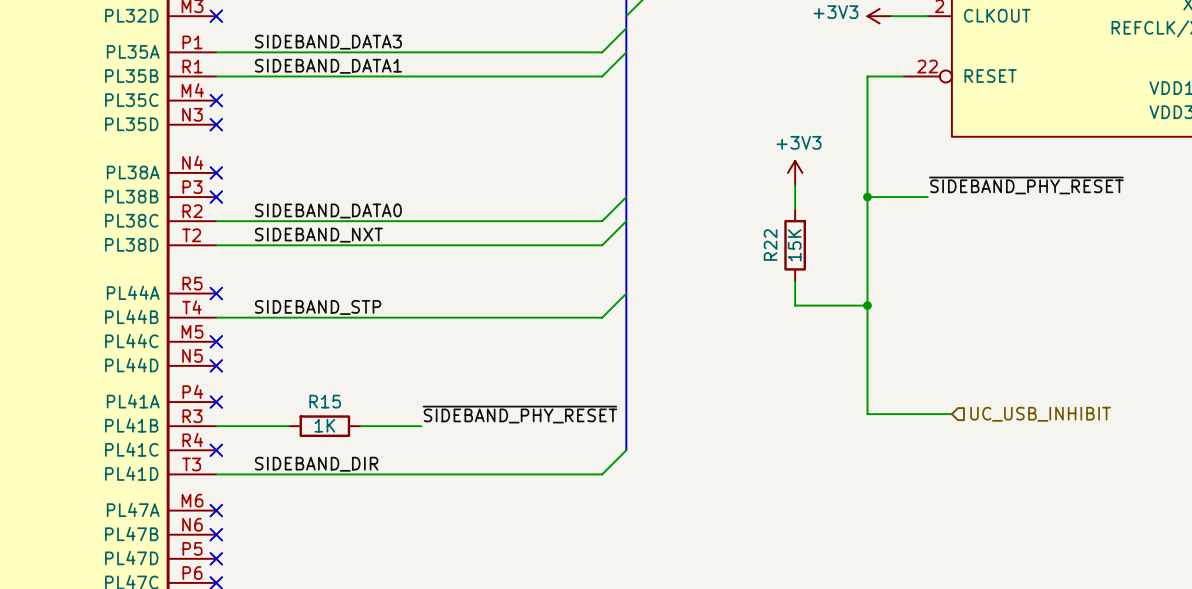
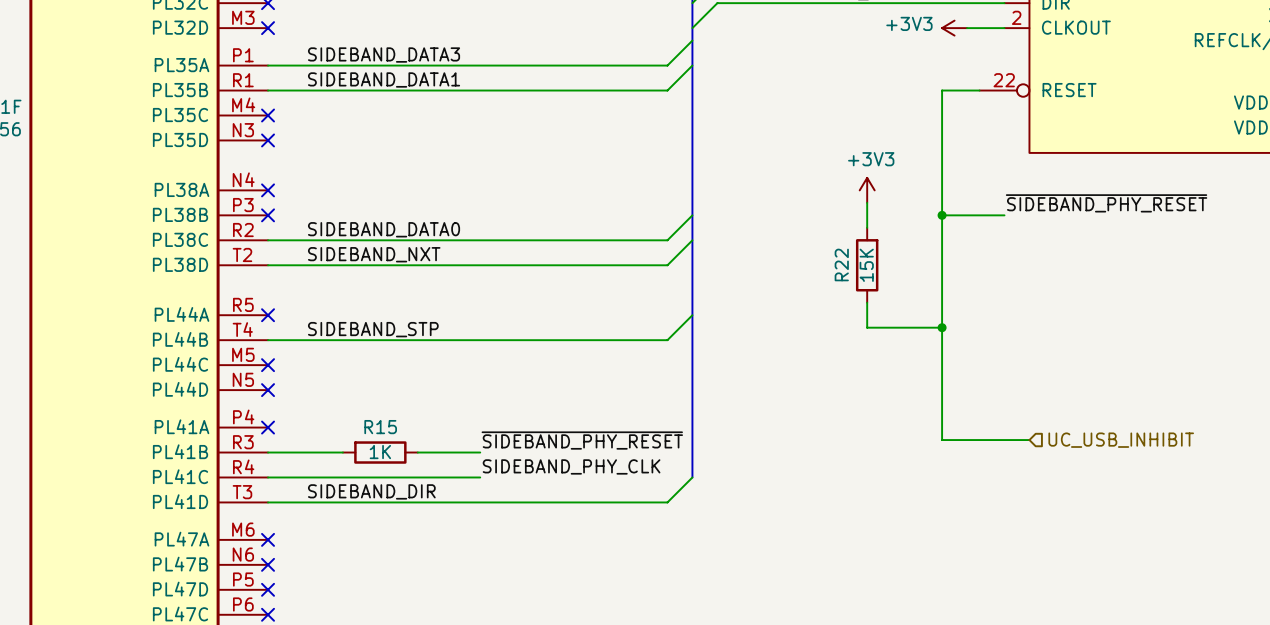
label: none -> SIDEBAND_PHY_CLK (571, 466)
wire: none -> (268, 477) (480, 477)
no-connect mark: (216, 450) -> none

